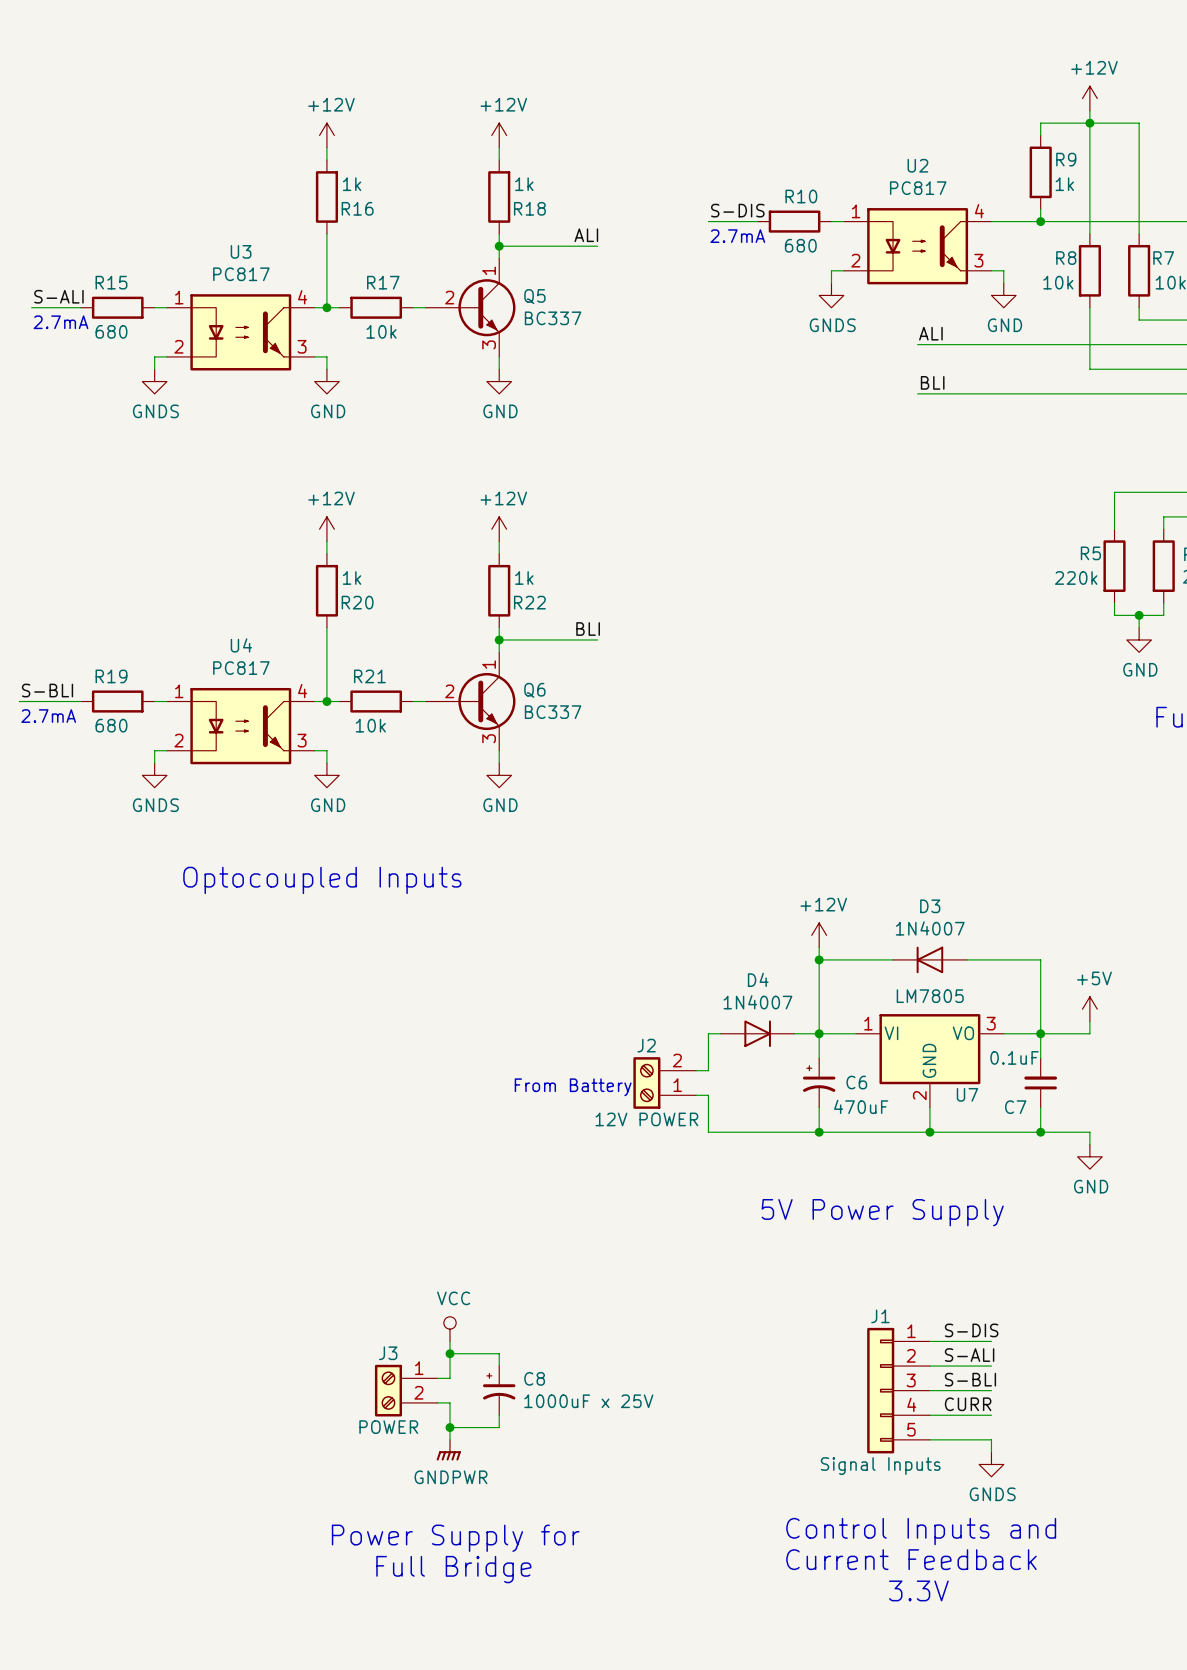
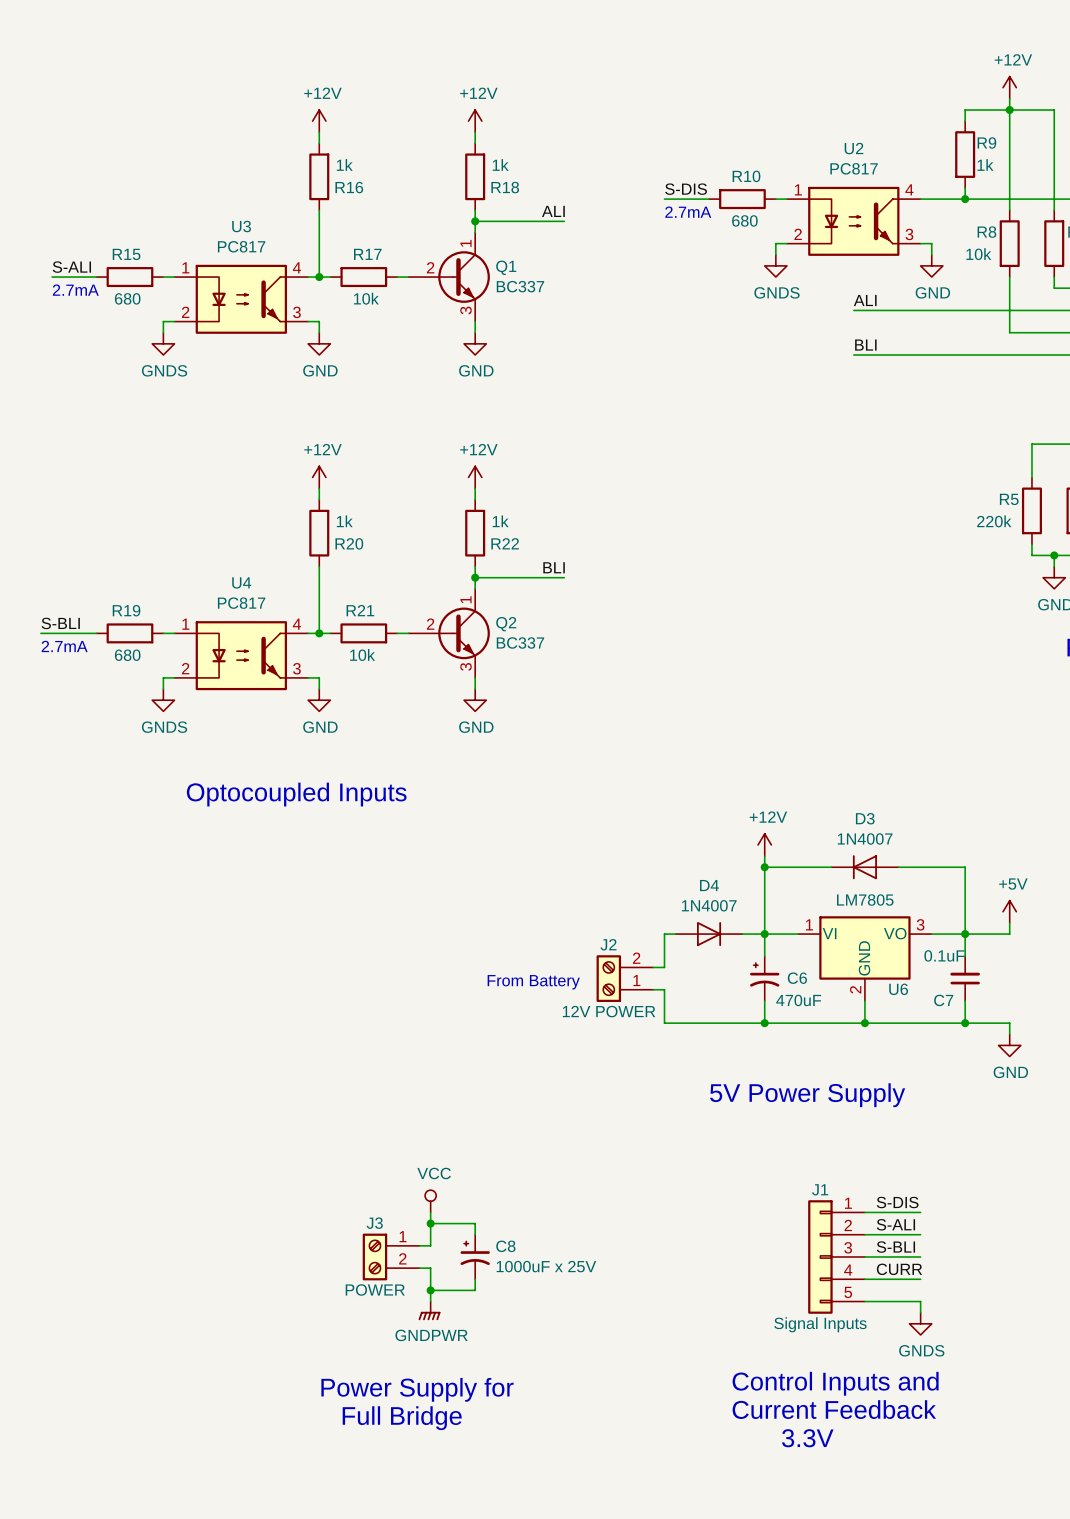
Q5 name: Q5 (534, 296) -> Q1 (506, 267)
Q6 name: Q6 (534, 690) -> Q2 (506, 624)
U7 name: U7 (967, 1094) -> U6 (898, 989)

